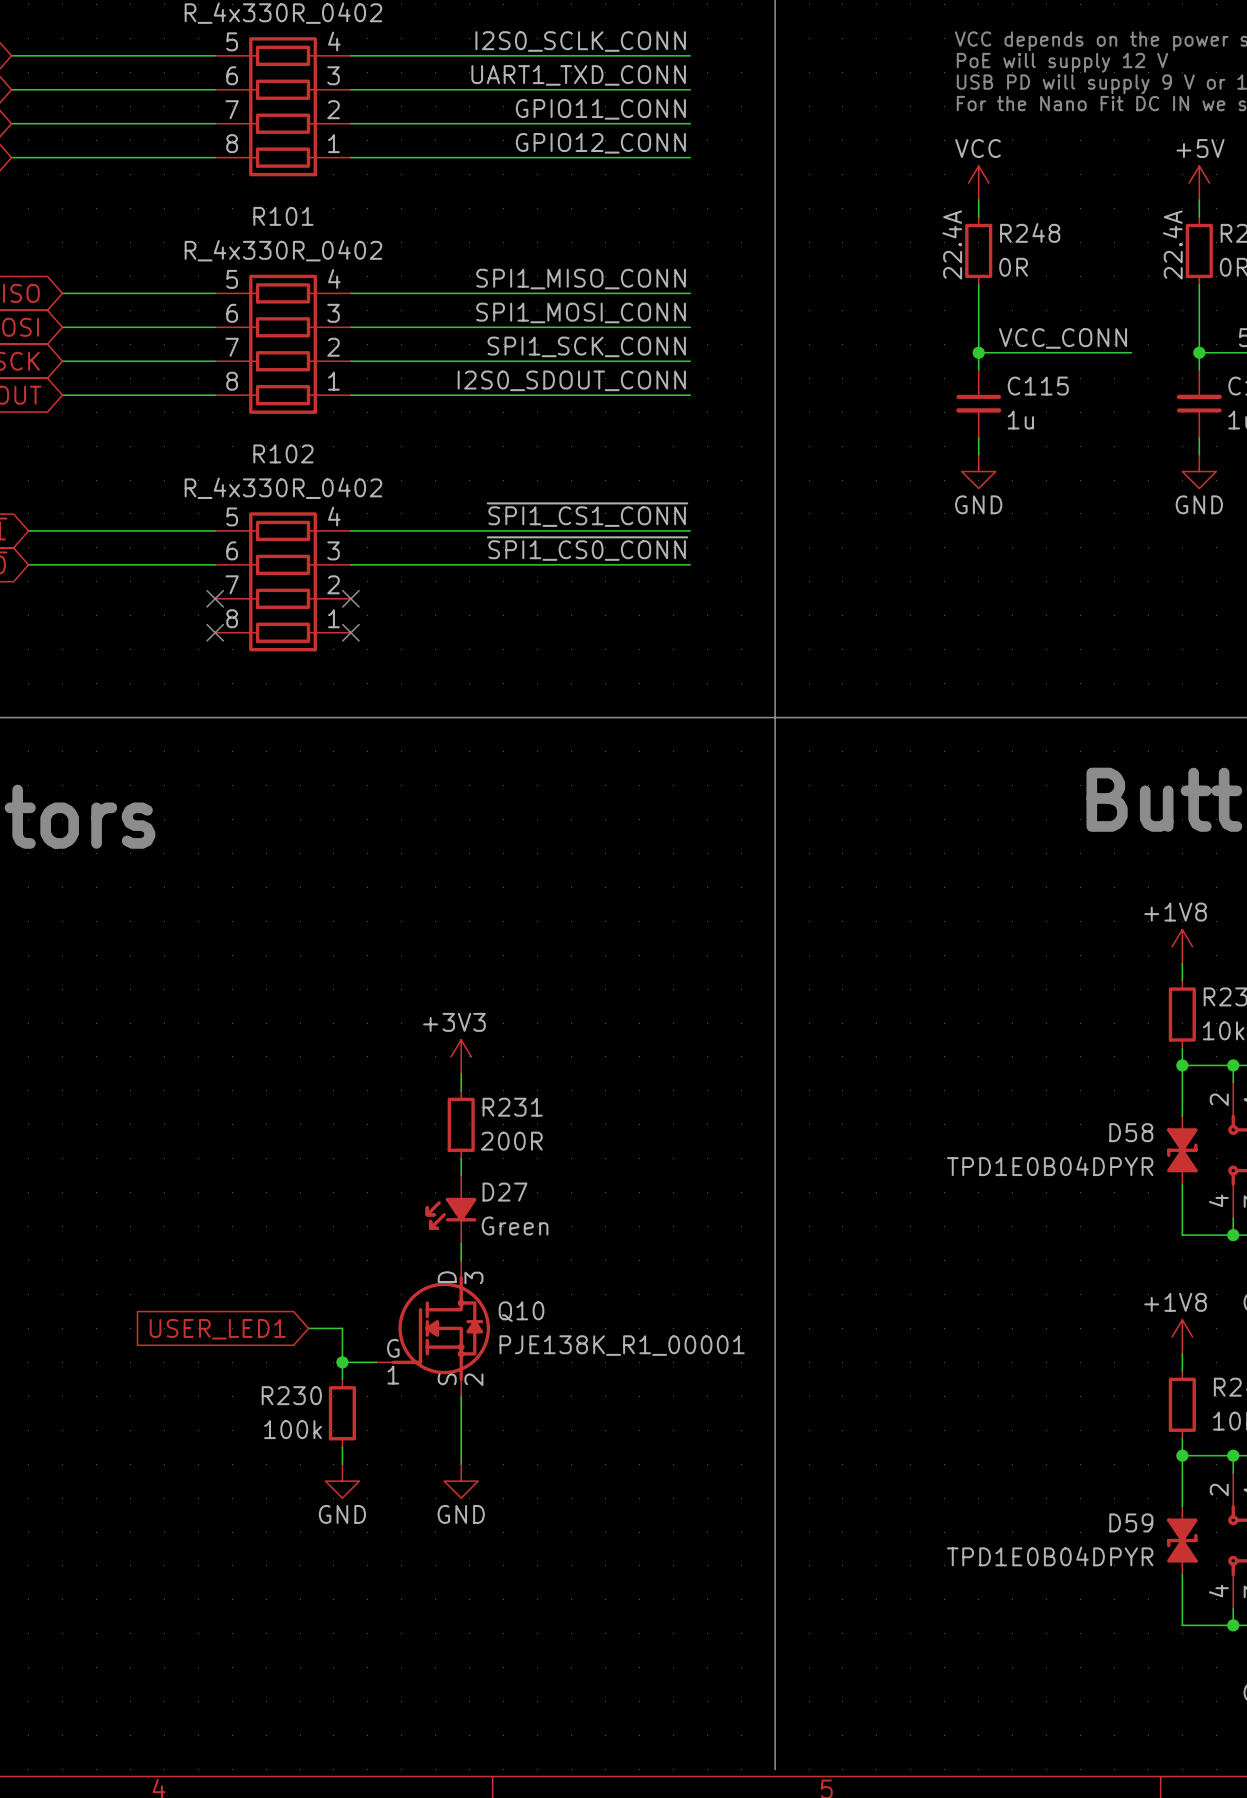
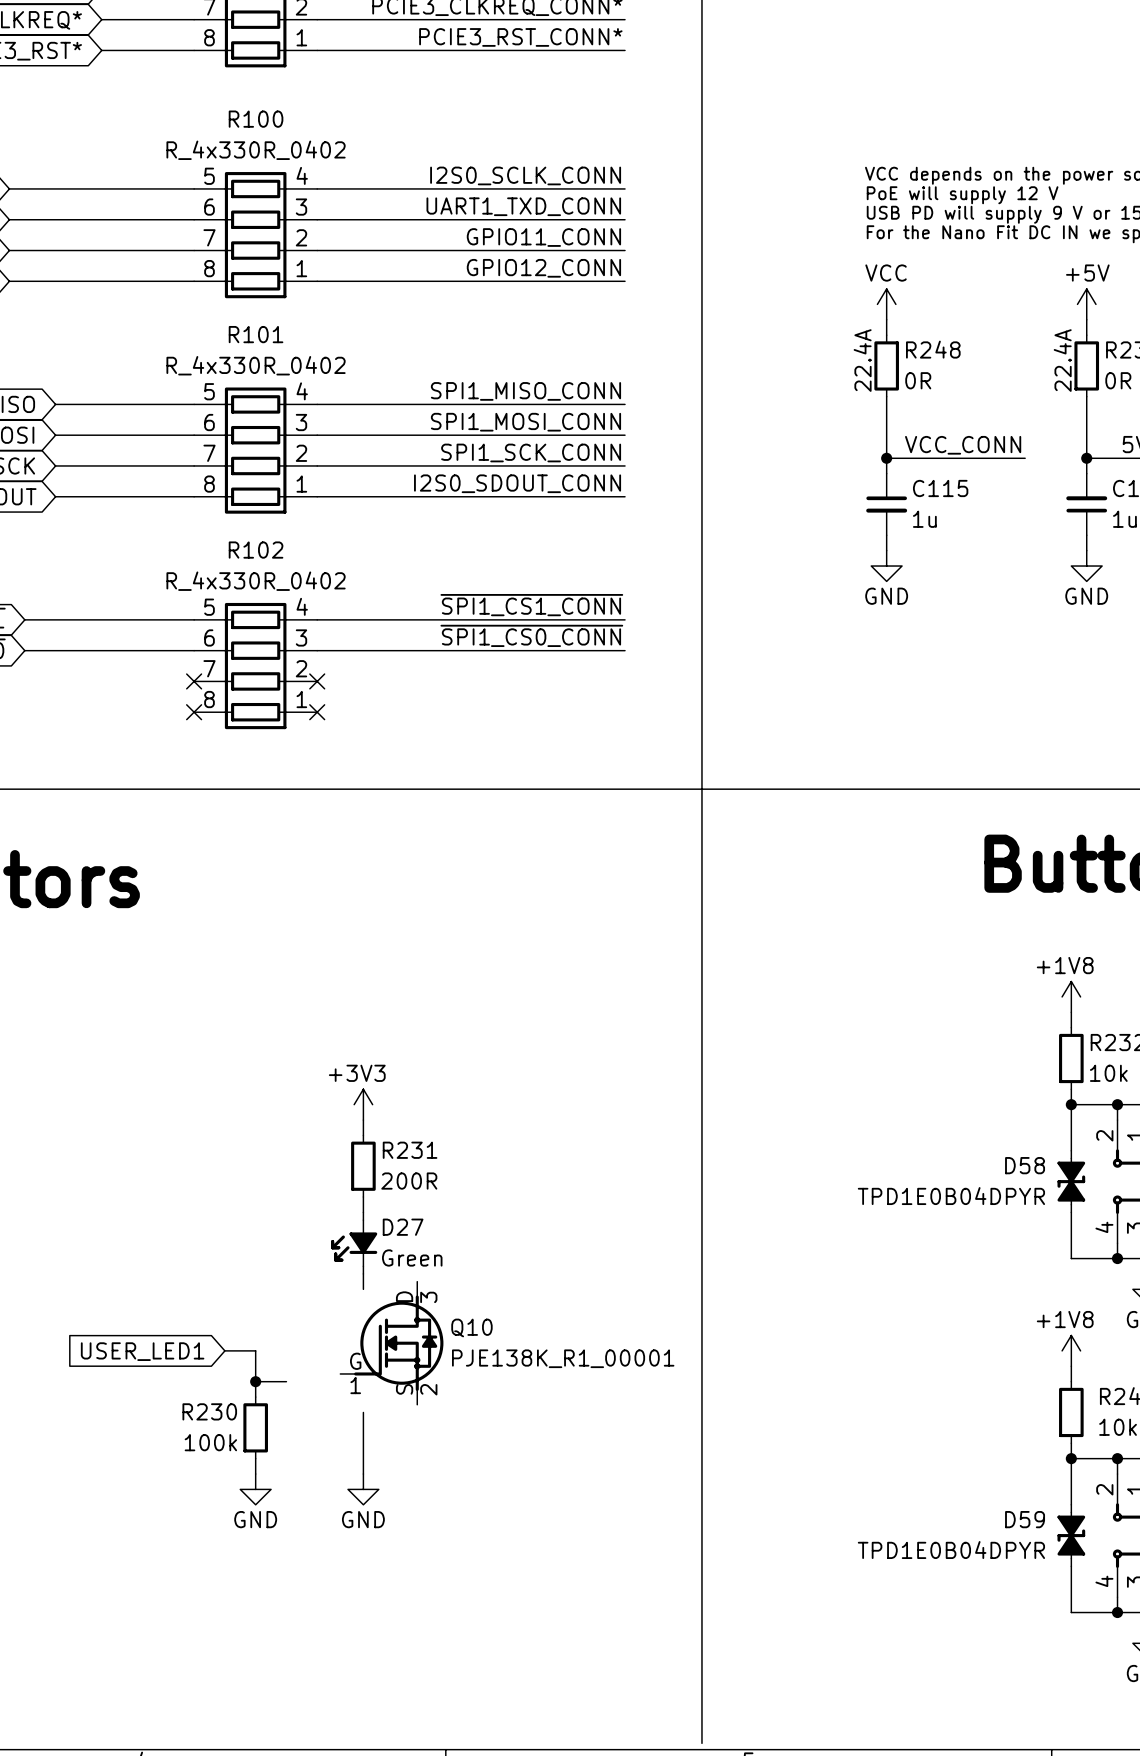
power symbol position: +3V3 (461, 1056) -> +3V3 (363, 1104)
wire: (461, 1073) (461, 1090) -> (363, 1120) (363, 1135)
R231 position: (461, 1124) -> (363, 1166)
wire: (461, 1158) (461, 1175) -> (363, 1197) (363, 1212)
D27 position: (451, 1209) -> (354, 1243)
wire: (461, 1243) (461, 1260) -> (363, 1273) (363, 1289)
wire: (308, 1328) (342, 1328) (342, 1379) -> (224, 1350) (255, 1350) (255, 1397)
global label position: USER_LED1 (217, 1329) -> USER_LED1 (142, 1351)
wire: (342, 1362) (376, 1362) -> (255, 1381) (286, 1381)
junction position: (342, 1362) -> (255, 1381)
wire: (461, 1396) (461, 1464) -> (363, 1412) (363, 1474)
R230 position: (342, 1413) -> (255, 1427)
wire: (342, 1447) (342, 1464) -> (255, 1458) (255, 1474)
power symbol: GND (342, 1481) -> none
power symbol: GND (461, 1481) -> none
power symbol: none -> GND (255, 1489)
power symbol: none -> GND (363, 1489)

